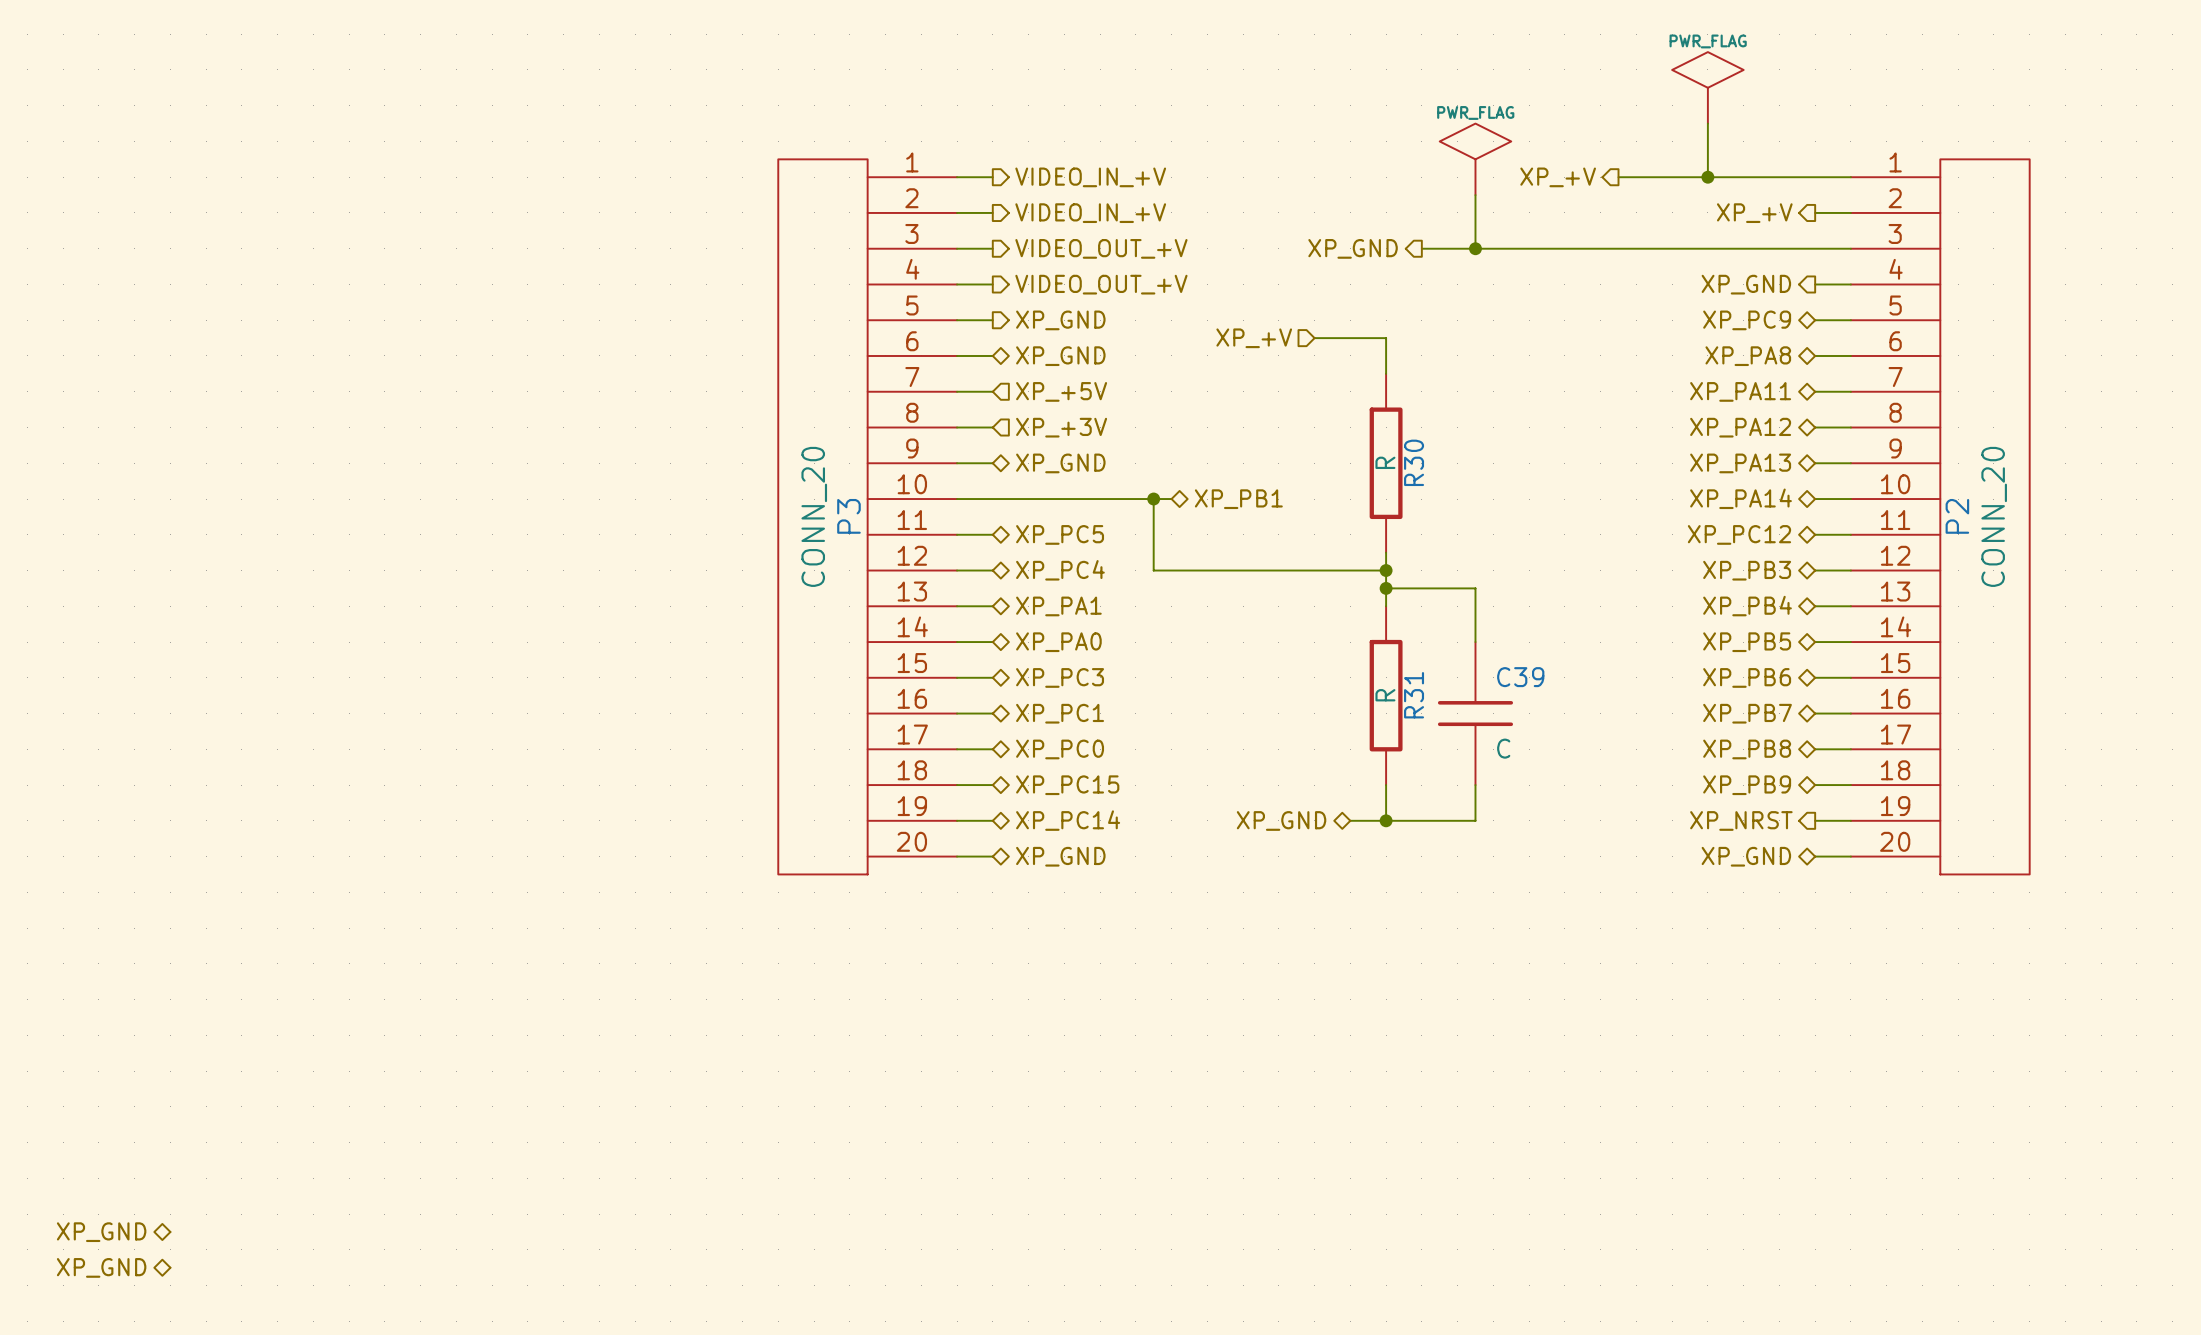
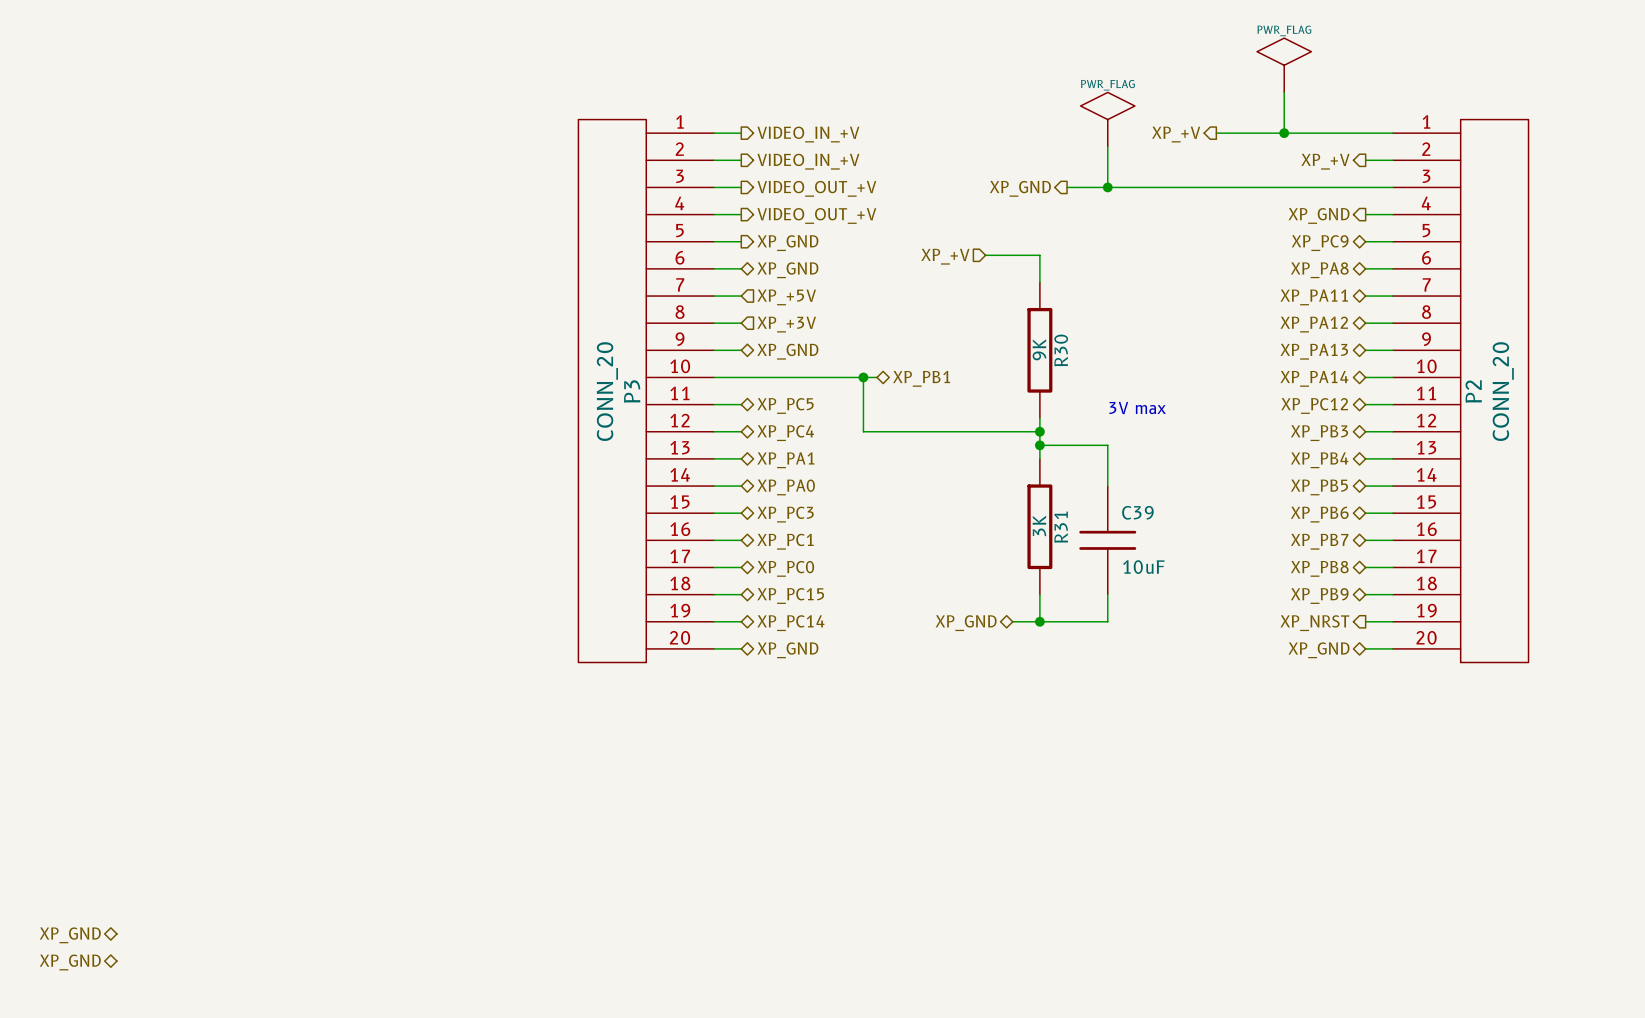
R30 value: R (1385, 462) -> 9K (1039, 349)
text: none -> 3V max (1137, 407)
R31 value: R (1385, 695) -> 3K (1039, 525)
C39 value: C (1503, 748) -> 10uF (1143, 567)

